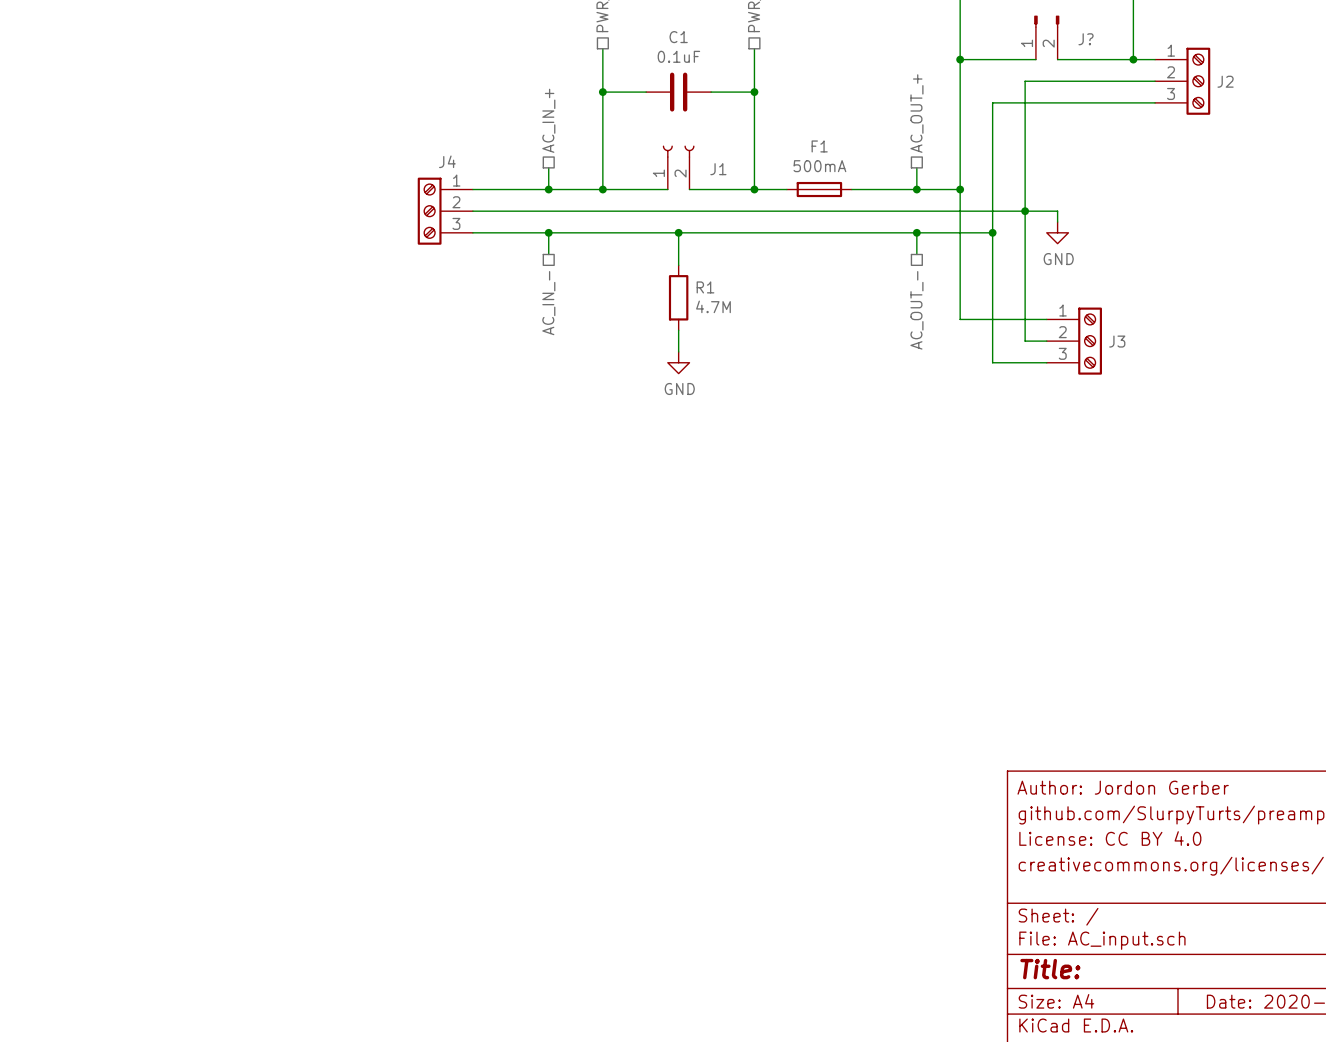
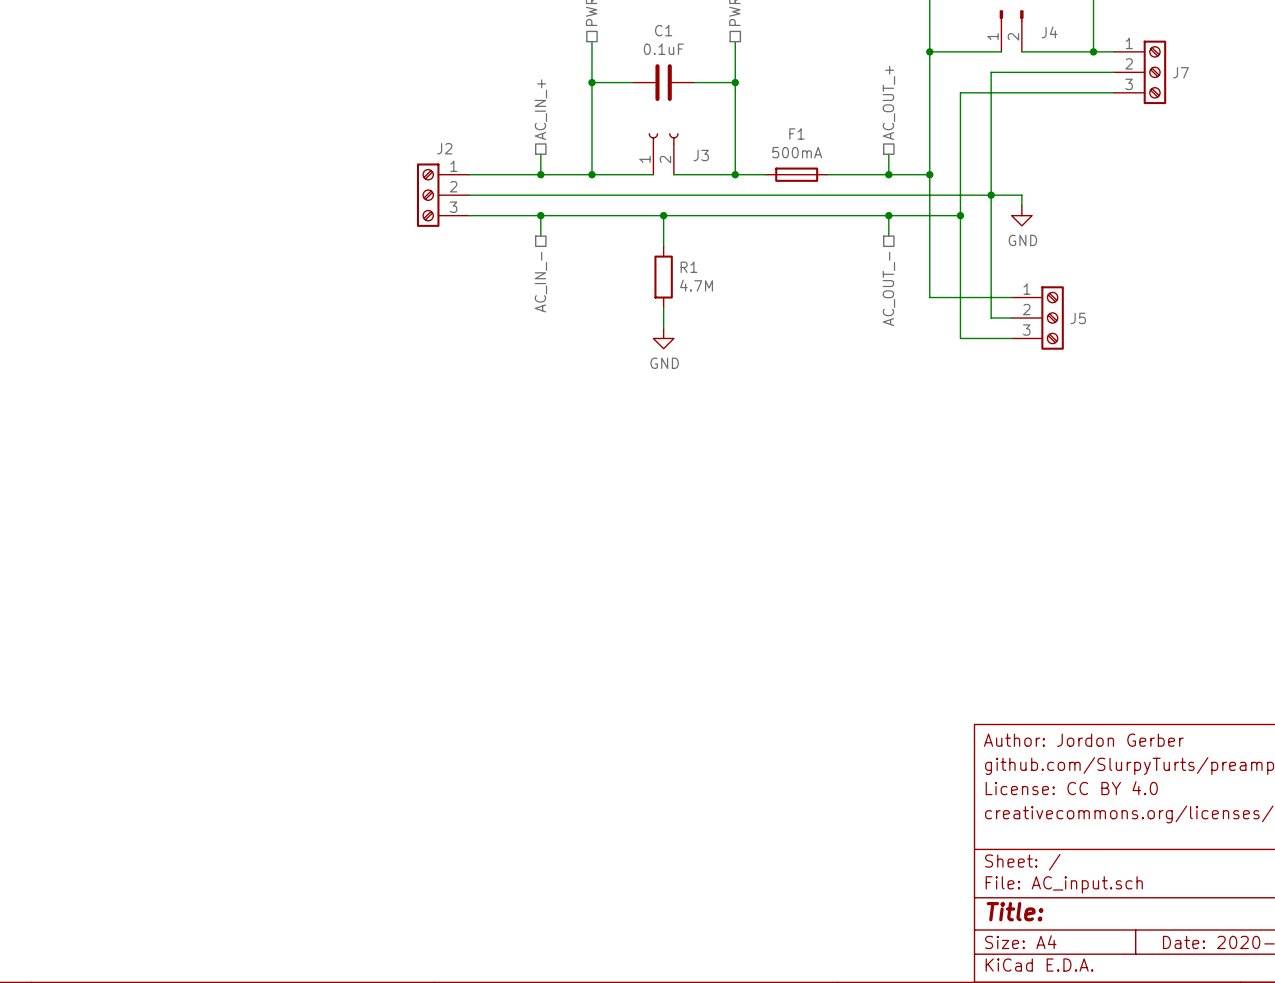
J? name: J? (1086, 39) -> J4 (1049, 32)
J2 name: J2 (1225, 81) -> J7 (1180, 72)
J4 name: J4 (447, 161) -> J2 (444, 148)
J1 name: J1 (718, 169) -> J3 (701, 155)
J3 name: J3 (1117, 341) -> J5 (1078, 318)

